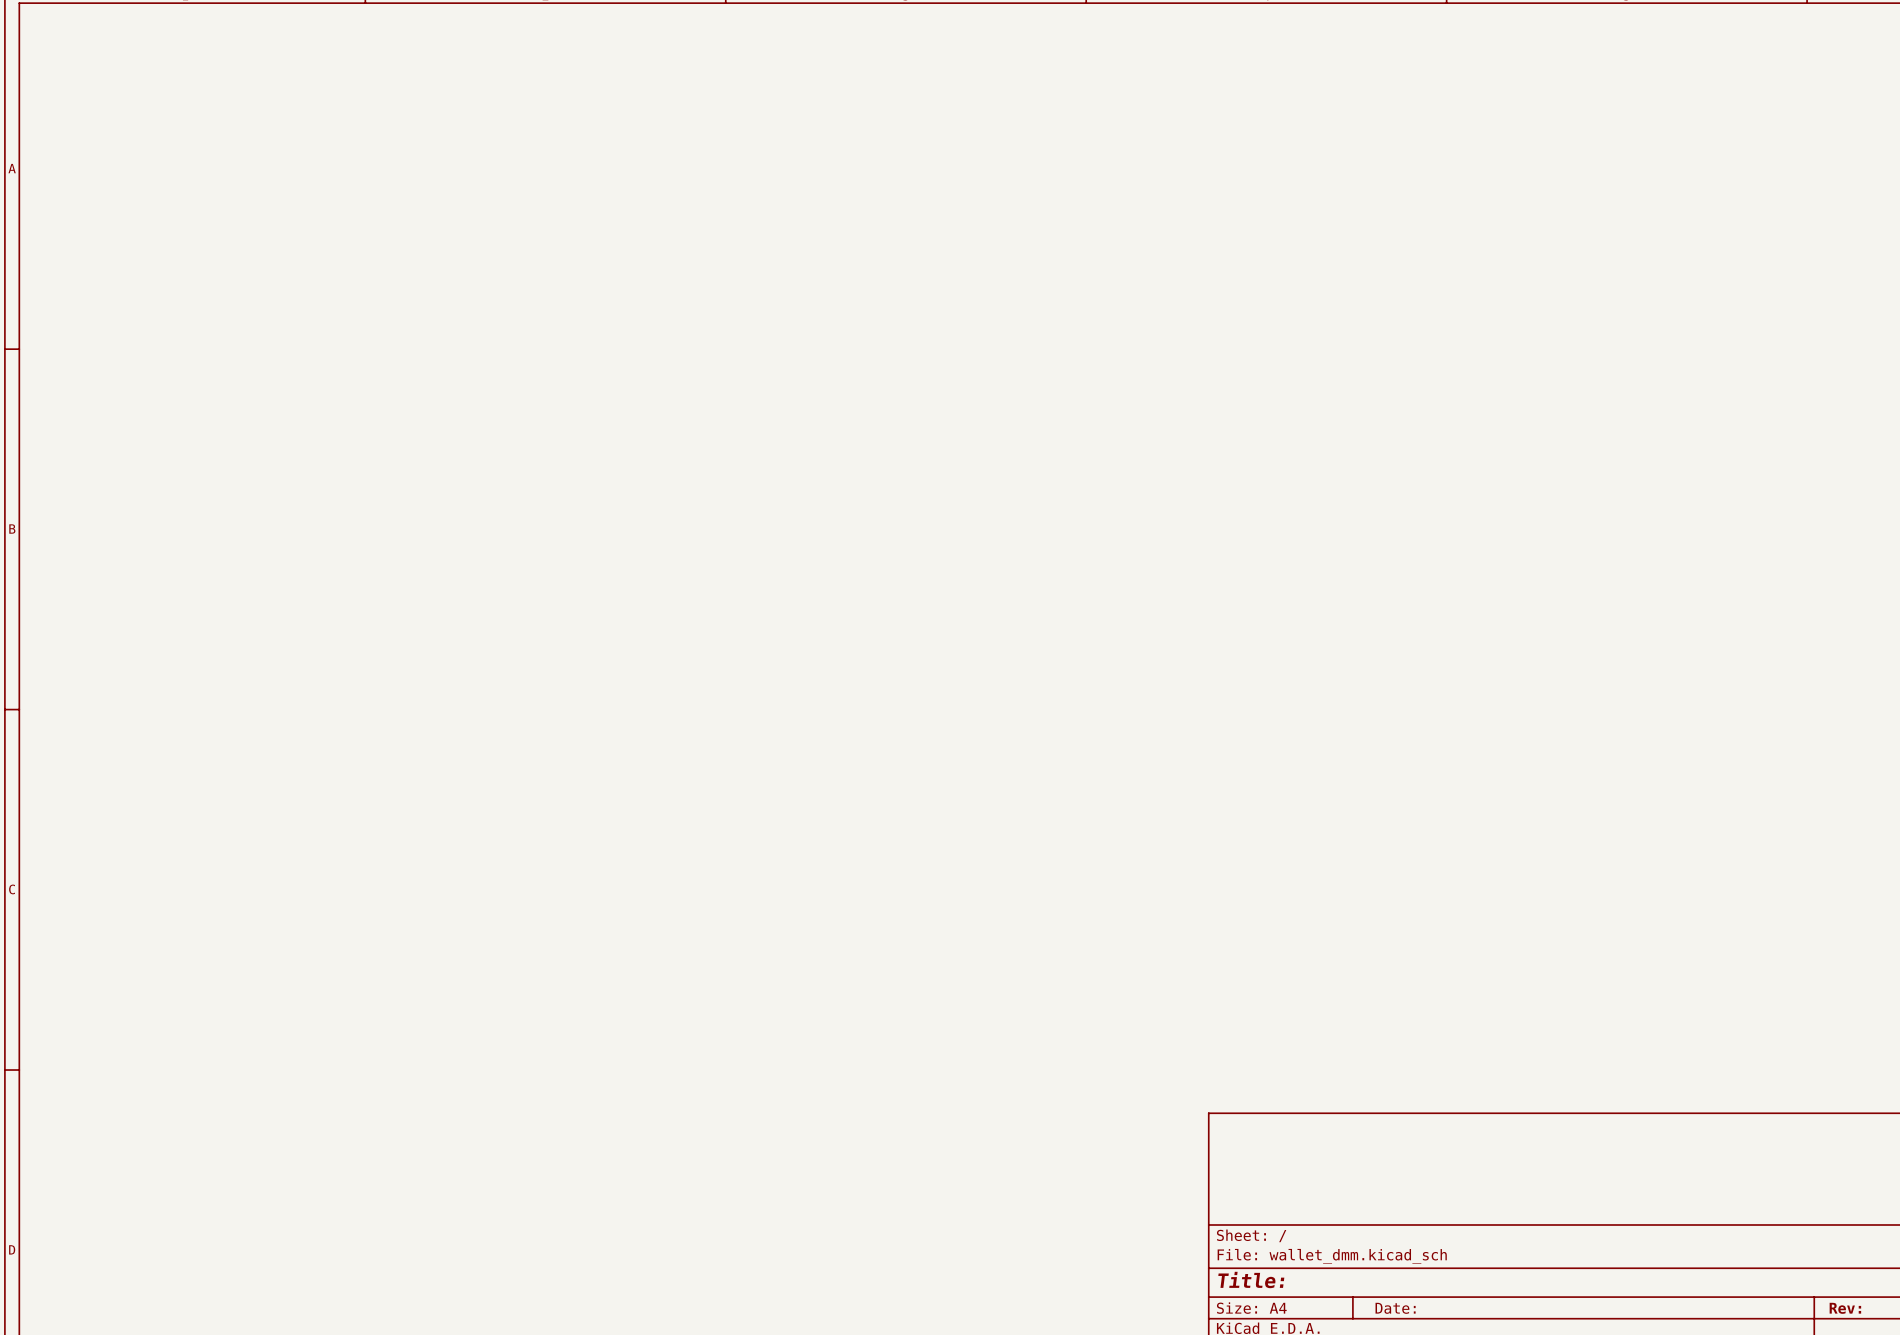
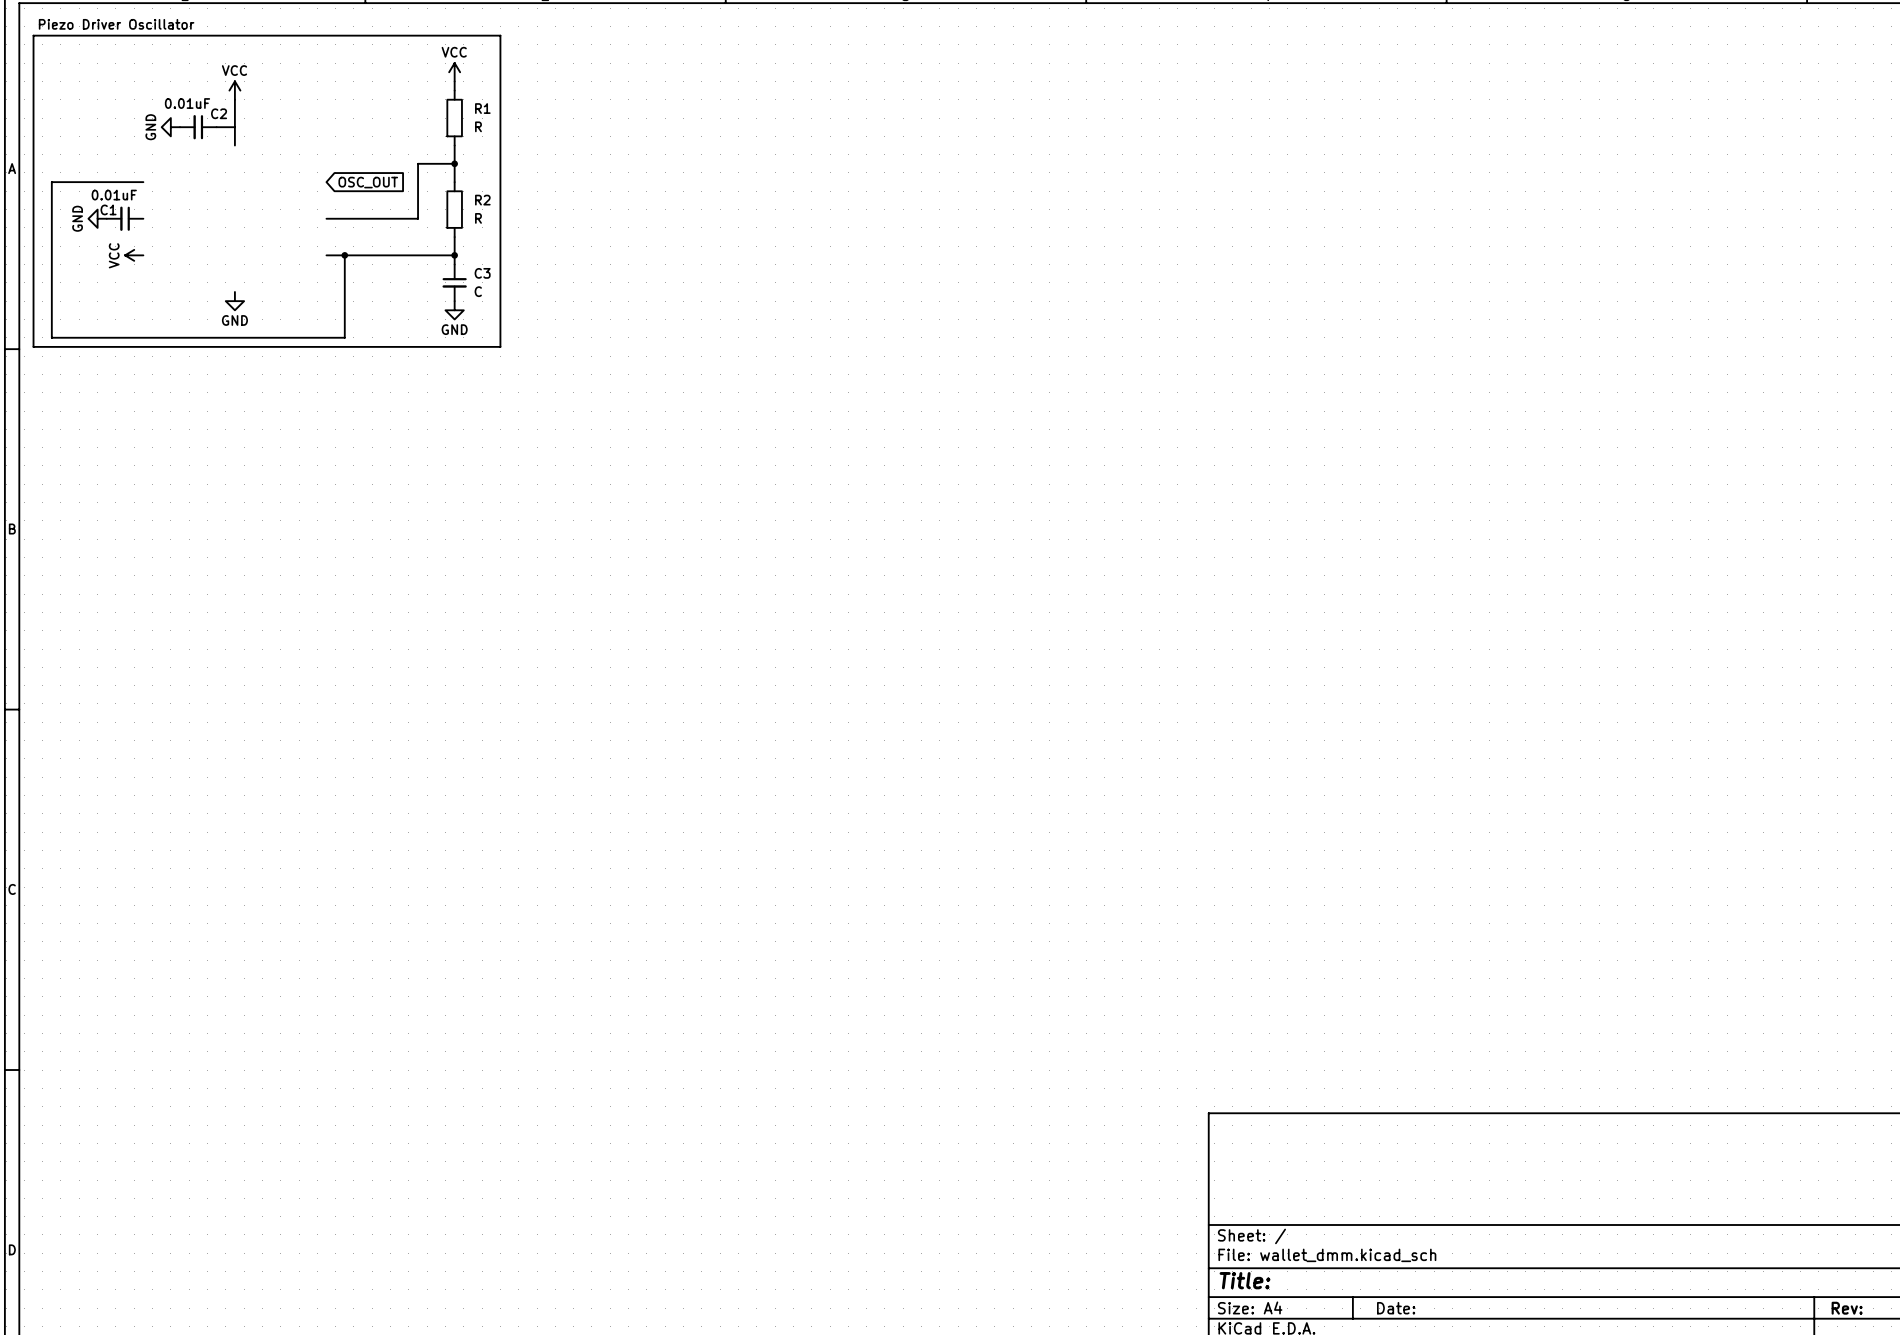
text: none -> Piezo Driver Oscillator (116, 24)
line: none -> (33, 35) (500, 35) (500, 346) (33, 346) (33, 35)
power symbol: none -> VCC (454, 72)
wire: none -> (454, 81) (454, 90)
power symbol: none -> VCC (234, 90)
wire: none -> (234, 99) (234, 145)
R1: none -> R (454, 118)
power symbol: none -> GND (170, 127)
C2: none -> 0.01uF (198, 127)
wire: none -> (216, 127) (234, 127)
wire: none -> (454, 145) (454, 182)
wire: none -> (454, 163) (418, 163) (418, 218) (326, 218)
junction: none -> (454, 163)
wire: none -> (143, 182) (51, 182) (51, 337) (344, 337) (344, 255)
global label: none -> OSC_OUT (368, 182)
R2: none -> R (454, 209)
power symbol: none -> GND (97, 218)
C1: none -> 0.01uF (125, 218)
wire: none -> (454, 237) (454, 264)
power symbol: none -> VCC (134, 255)
wire: none -> (326, 255) (454, 255)
junction: none -> (344, 255)
junction: none -> (454, 255)
C3: none -> C (454, 282)
power symbol: none -> GND (234, 301)
power symbol: none -> GND (454, 310)

